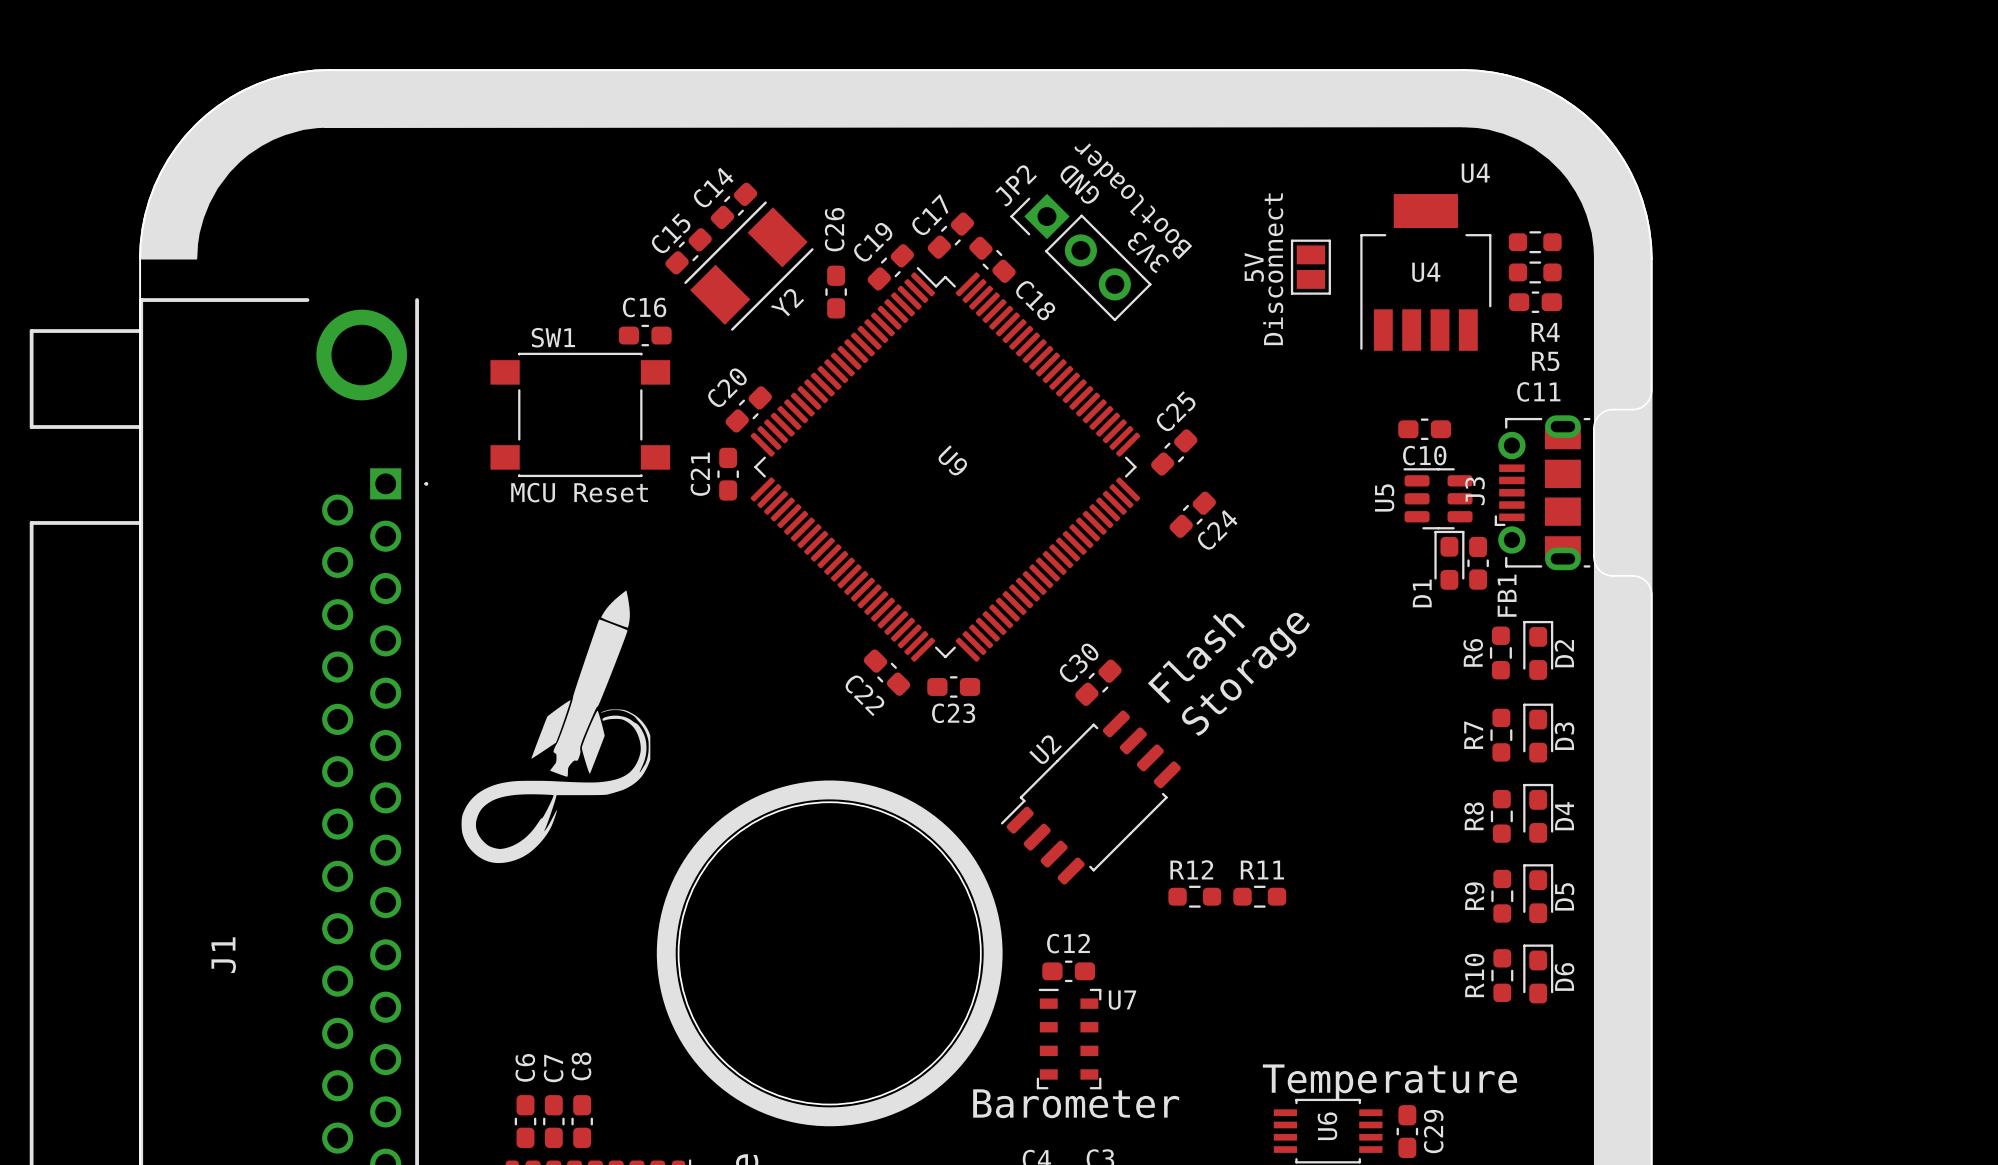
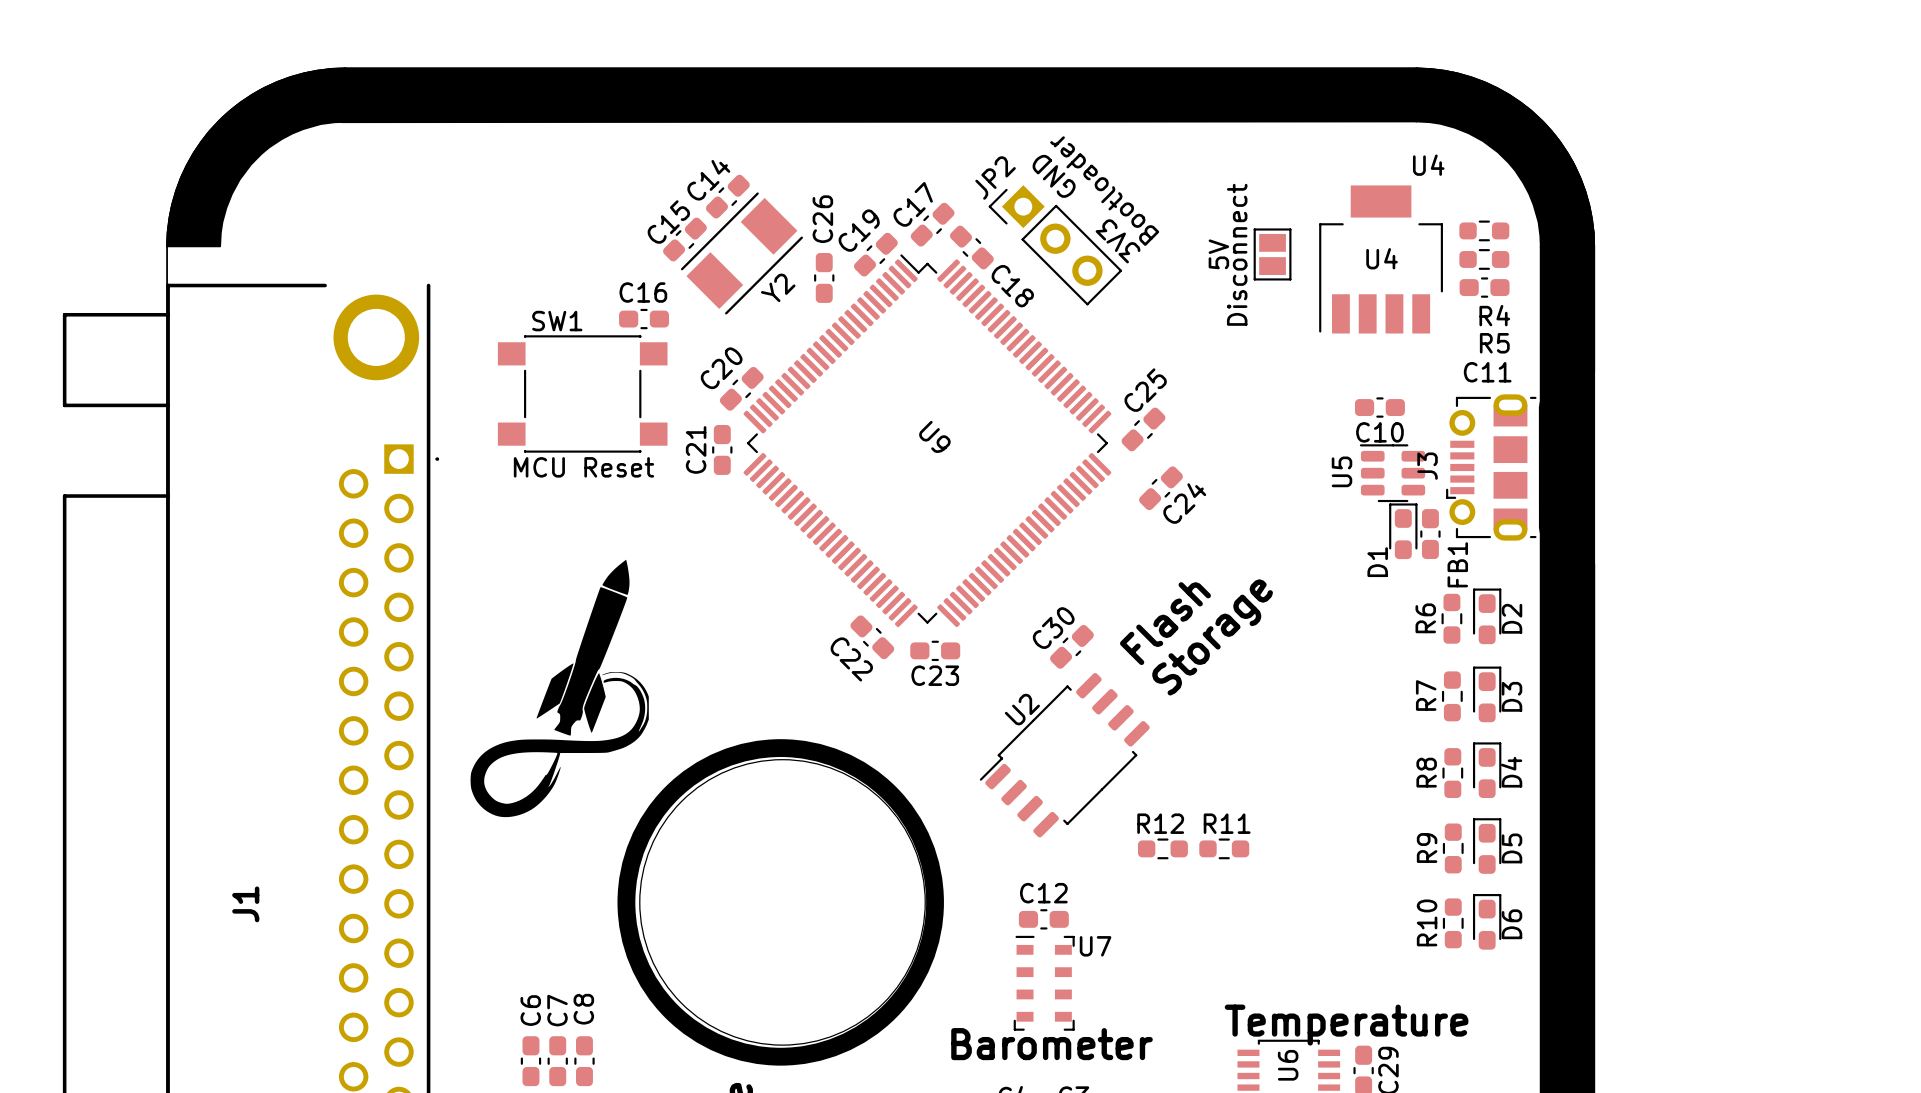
drawing position: (829, 953) -> (780, 902)
round board edge position: (829, 953) -> (782, 902)

